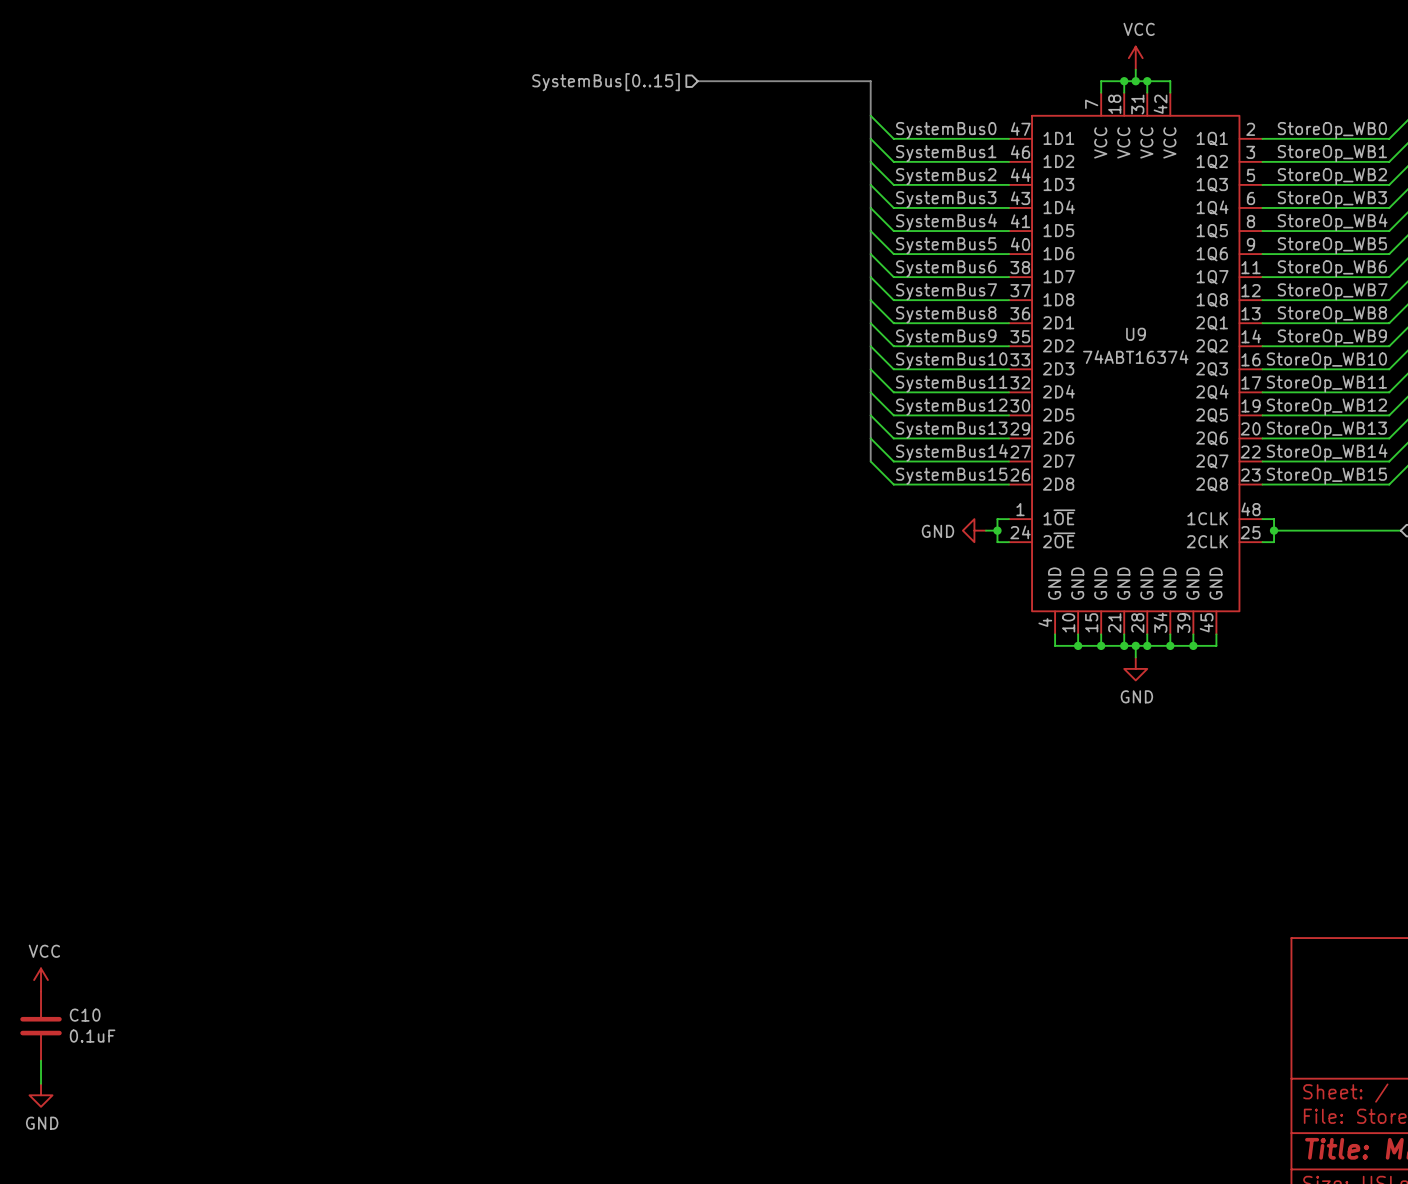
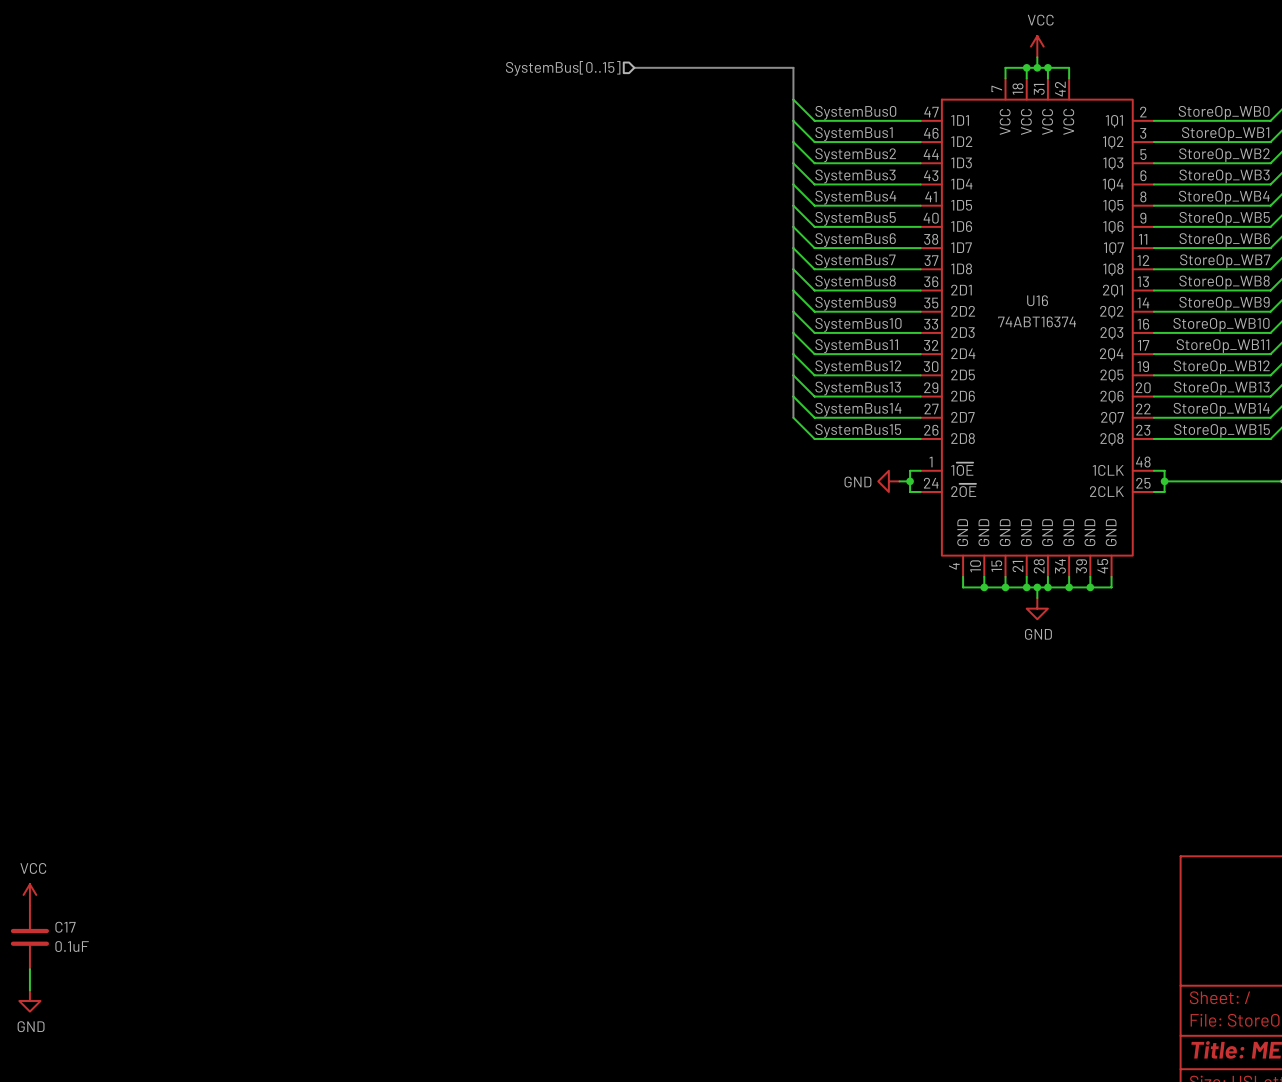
U9 name: U9 (1136, 334) -> U16 (1037, 300)
C10 name: C10 (85, 1015) -> C17 (65, 927)

